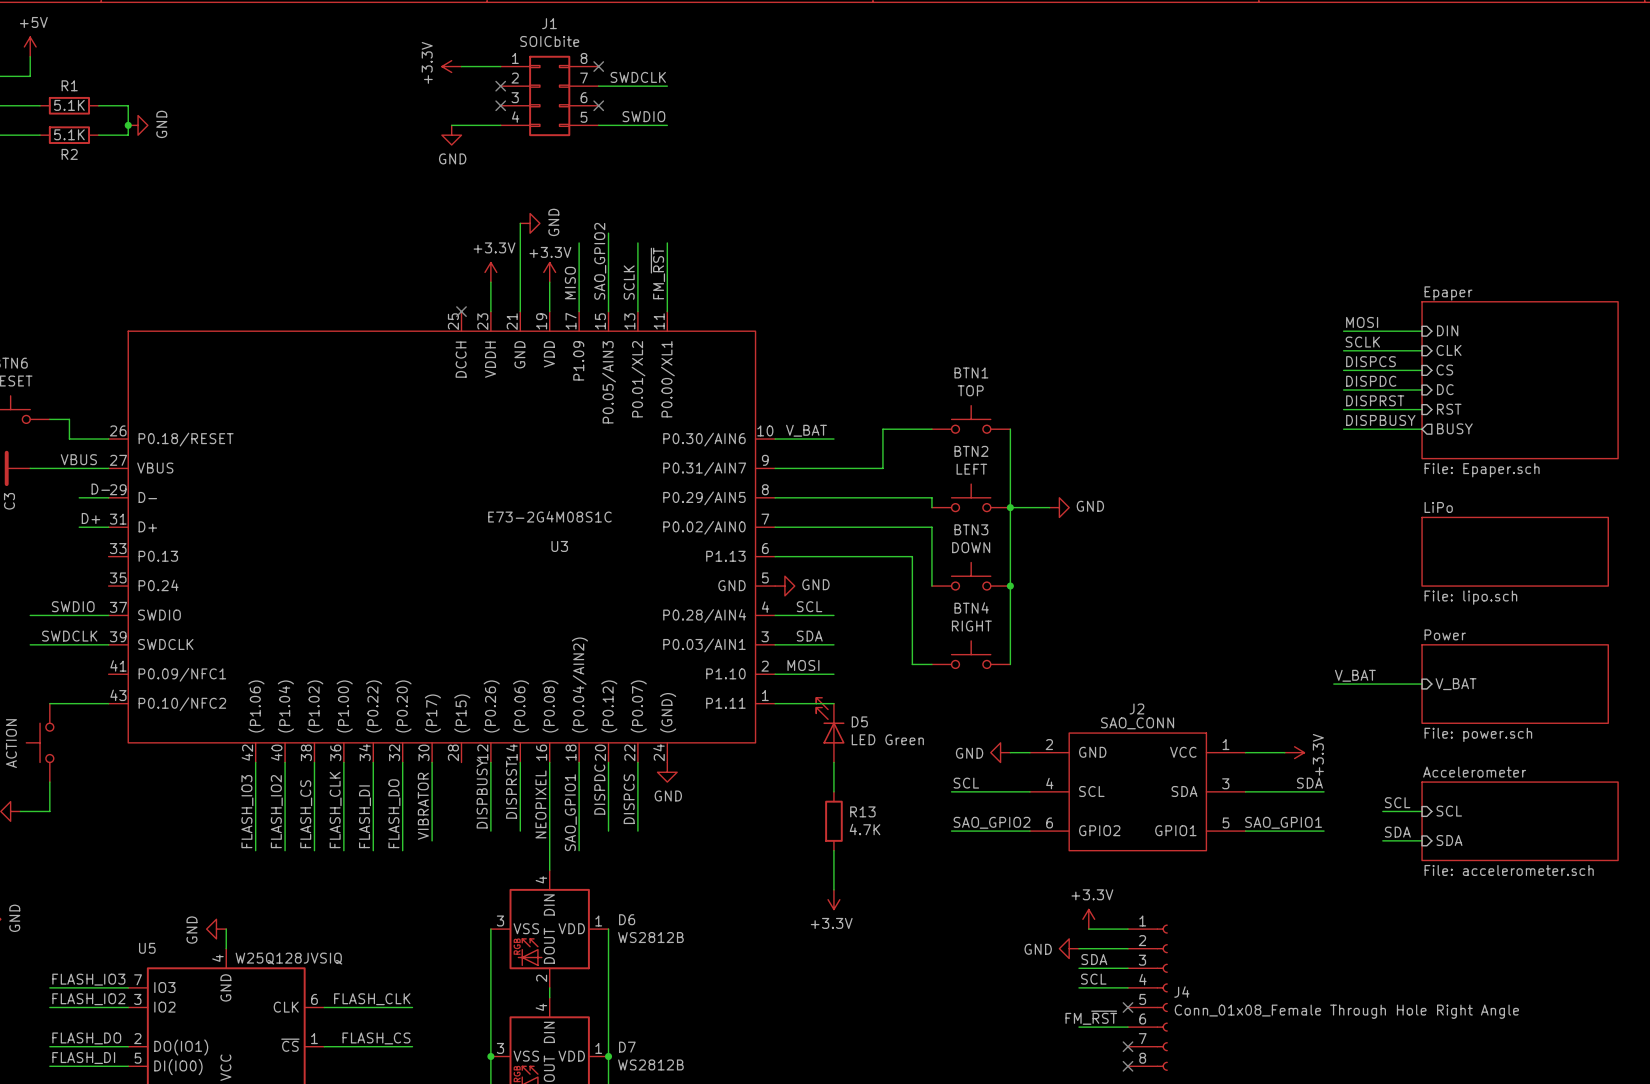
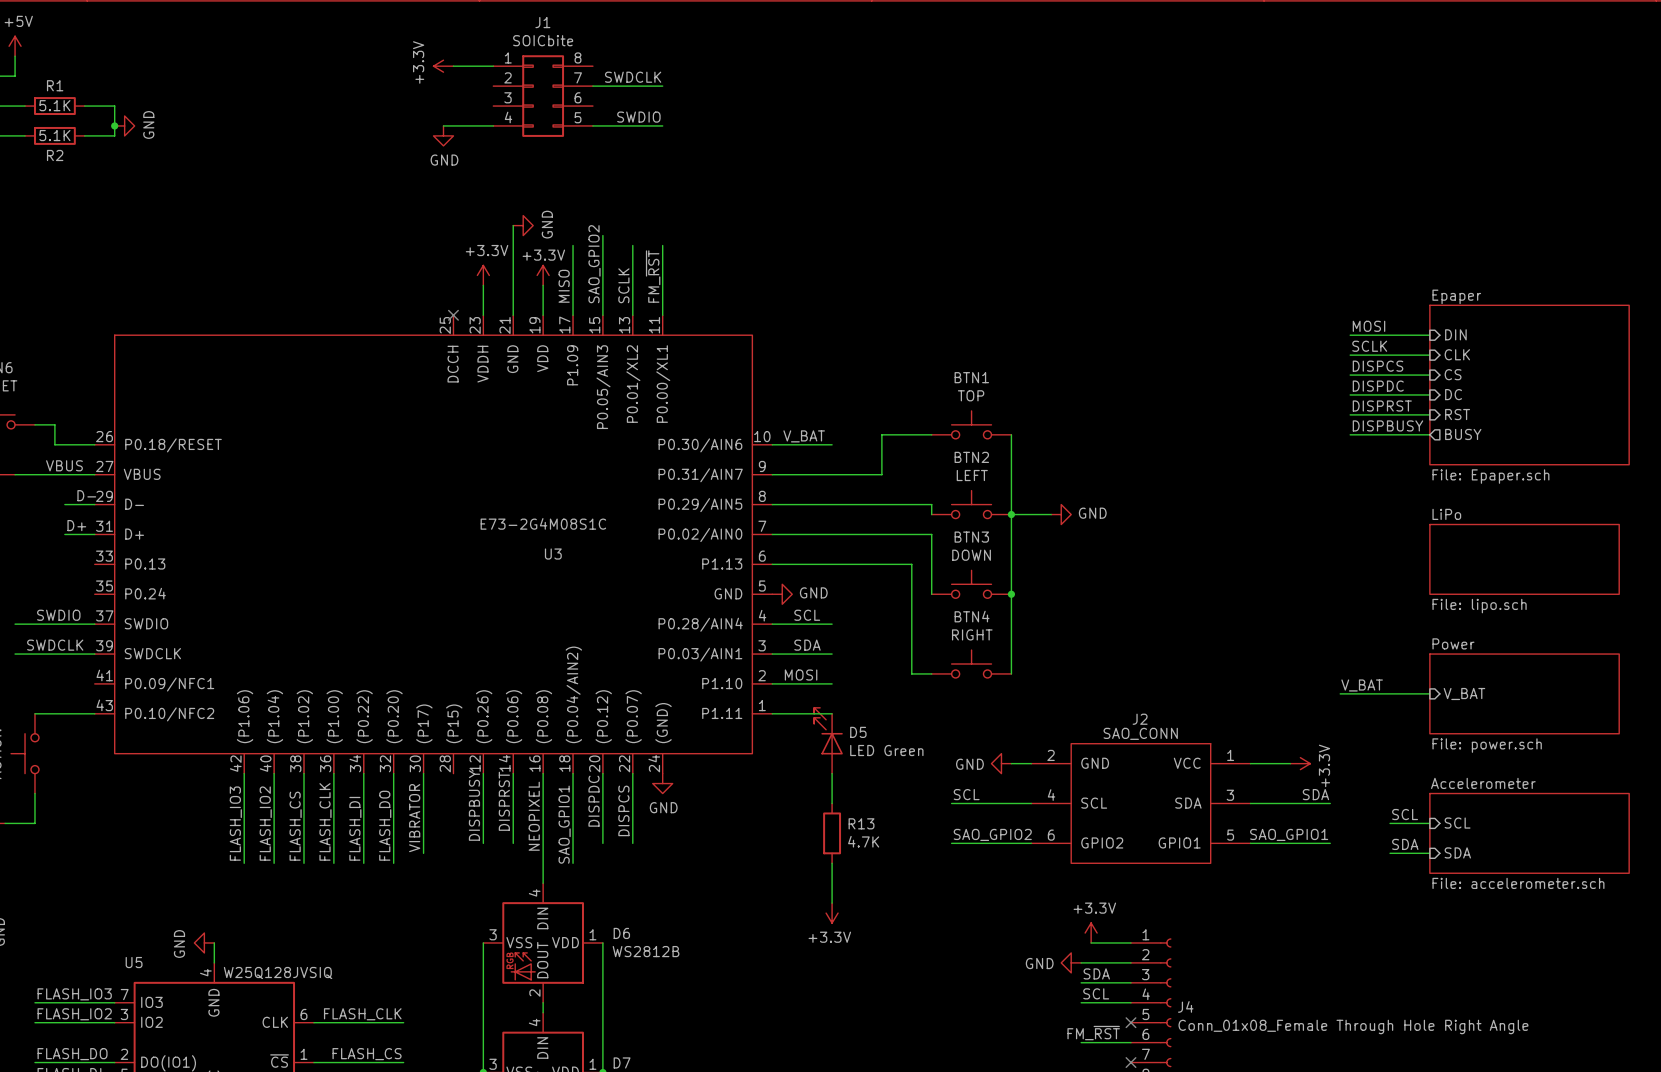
no-connect mark: (598, 66) -> none
no-connect mark: (500, 86) -> none
no-connect mark: (500, 105) -> none
no-connect mark: (598, 105) -> none

